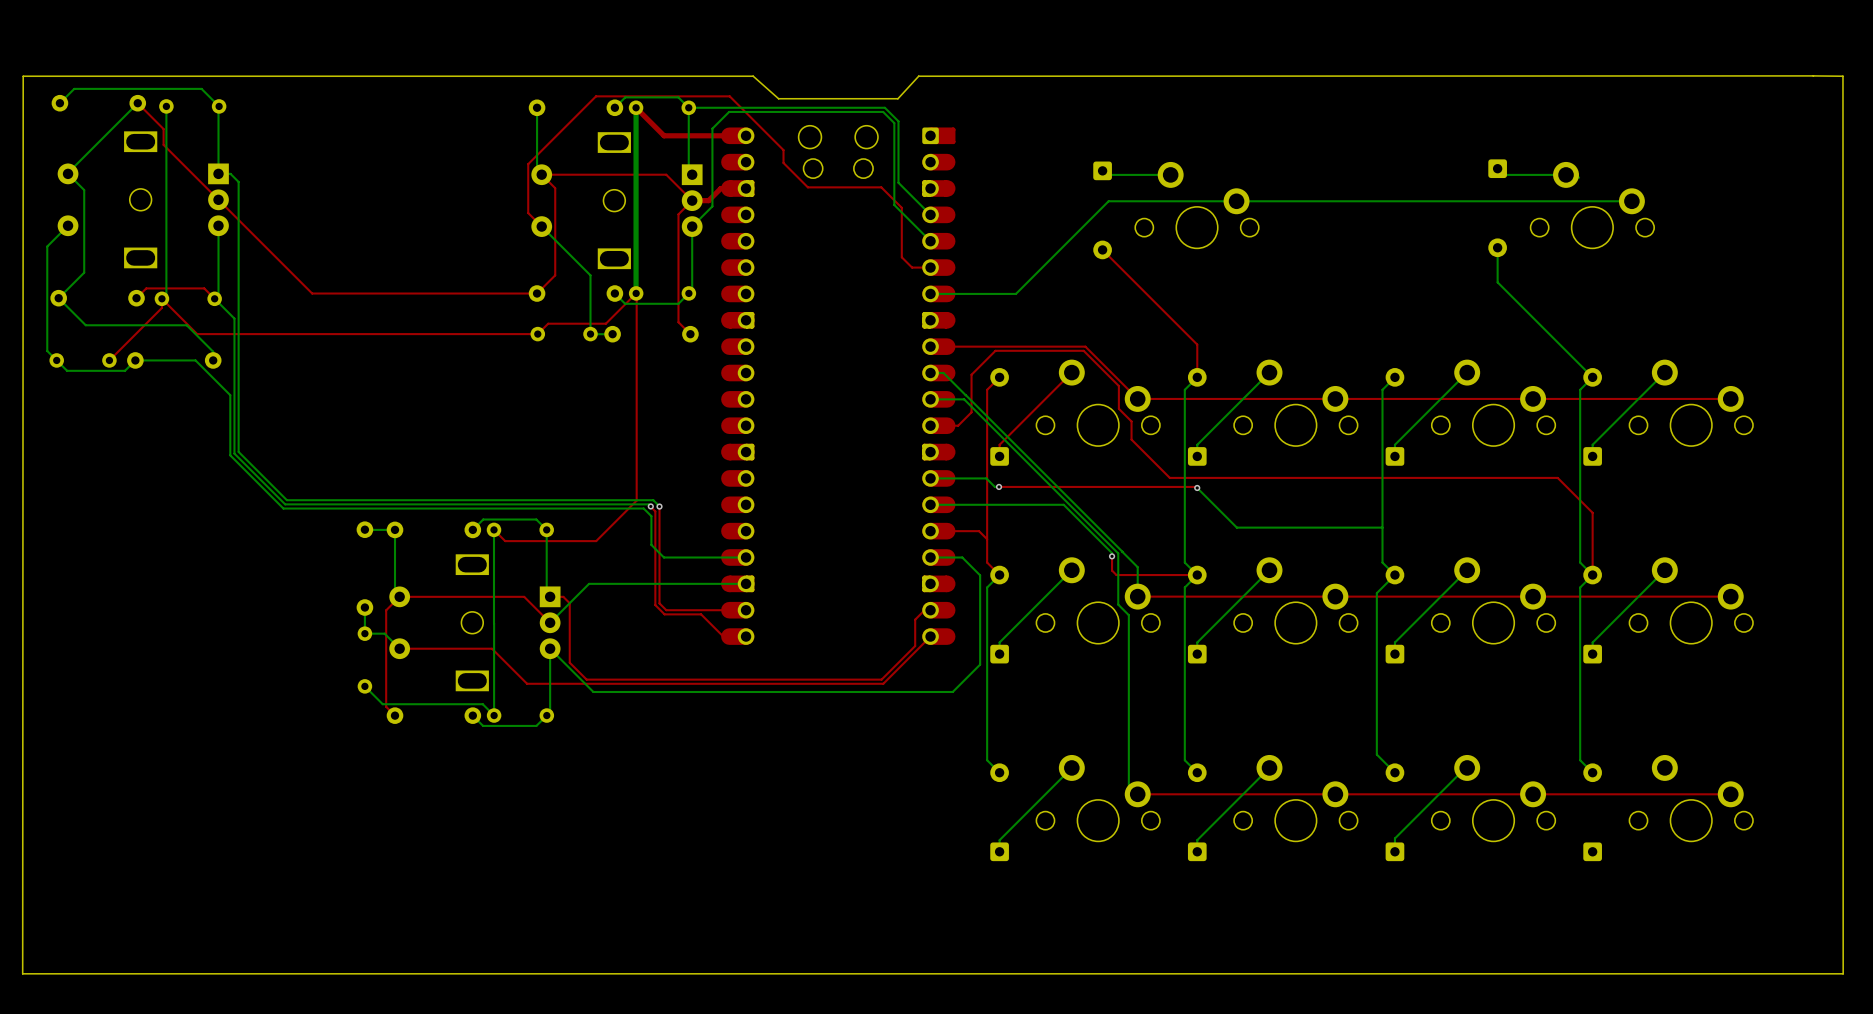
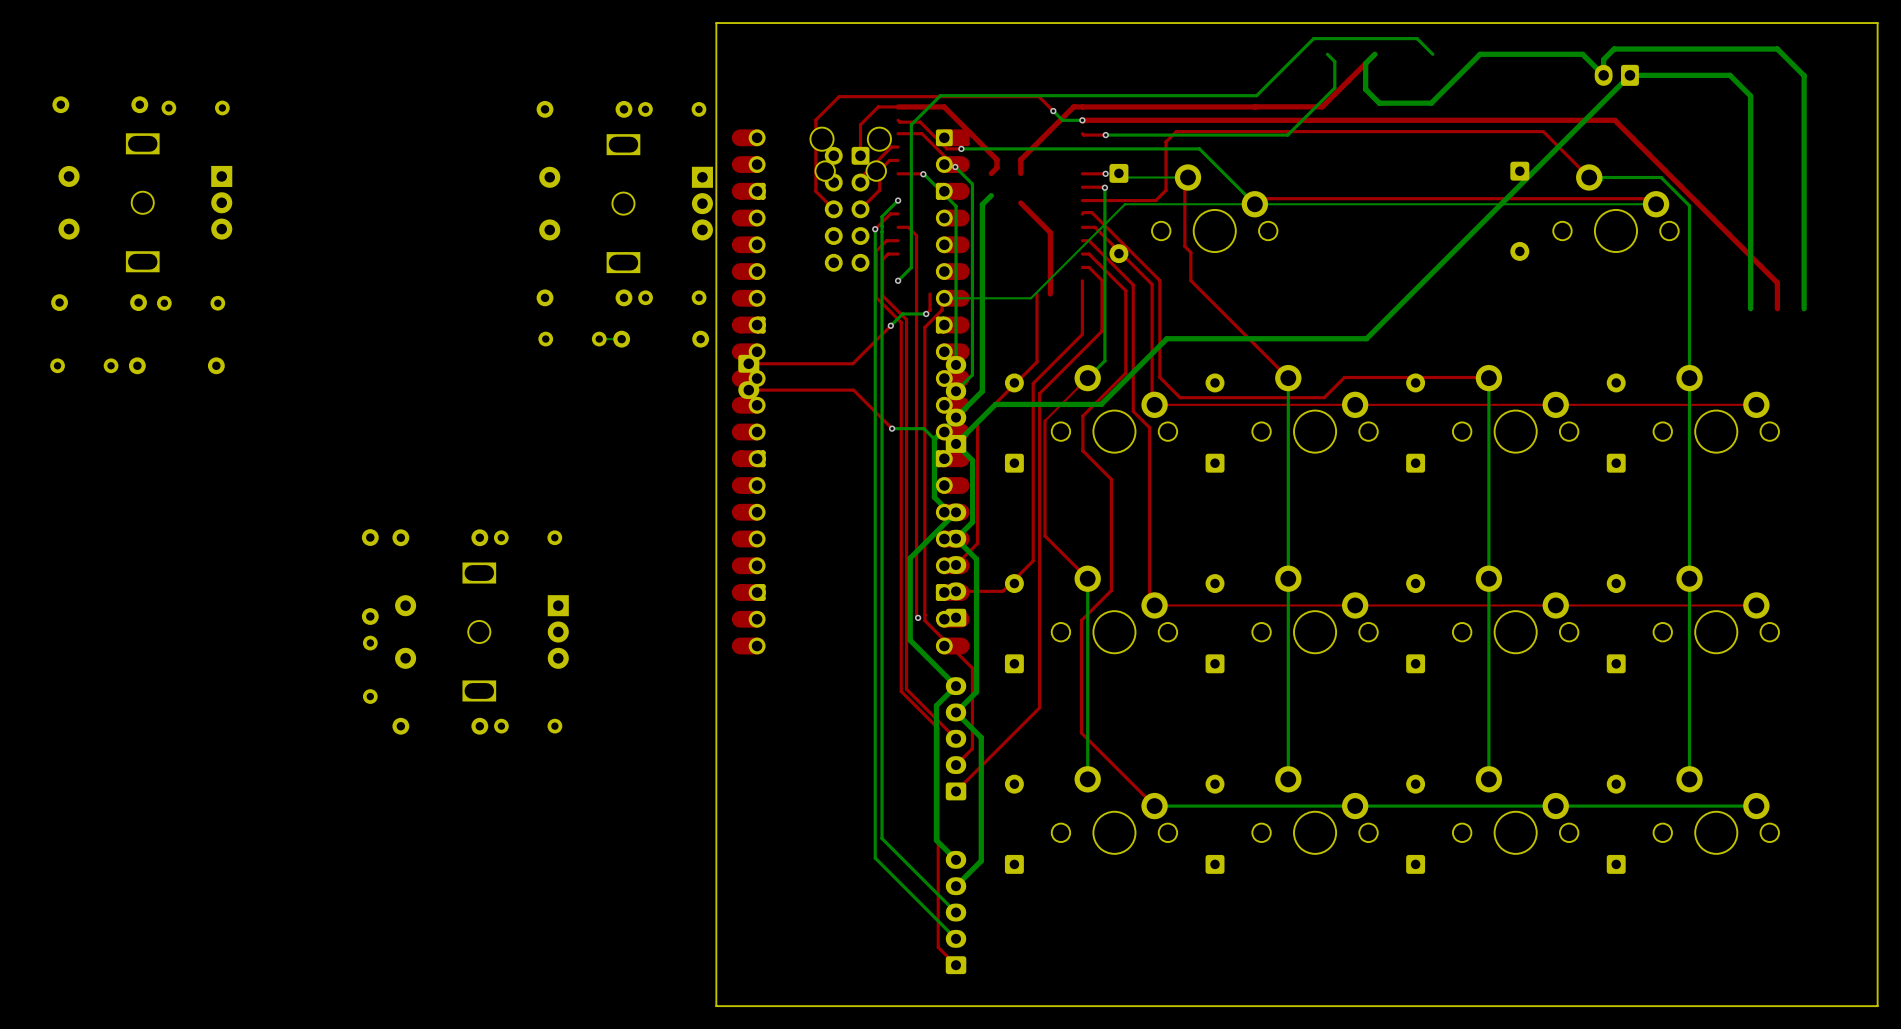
bottom track: none -> (1327, 54) (1334, 61) (1334, 87) (1287, 135) (1105, 135)
top track: none -> (1374, 54) (1348, 80)
bottom track: none -> (1374, 54) (1365, 63) (1365, 89) (1379, 103) (1431, 103) (1480, 54) (1582, 54) (1603, 75) (1603, 59) (1614, 49) (1777, 49) (1804, 75) (1804, 308)
bottom track: none -> (1432, 54) (1417, 38) (1313, 38) (1256, 95) (940, 95) (911, 124) (911, 267) (898, 280)
part: none -> (1616, 75)
board edge: (23, 76) (753, 76) (778, 98) (897, 98) (918, 76) (1842, 76) (1843, 973) (22, 973) (23, 76) -> (1877, 23) (1877, 1006) (716, 1006) (716, 23) (1877, 23)
top track: none -> (1348, 80) (1322, 106) (1255, 106)
bottom track: (59, 103) (74, 88) (201, 88) (219, 106) (218, 173) (230, 173) (238, 181) (238, 451) (286, 500) (653, 500) (659, 506) -> none
top track: (137, 103) (163, 129) (163, 144) (312, 293) (537, 293) (555, 275) (555, 188) (541, 174) (666, 174) (692, 200) -> none
bottom track: (137, 103) (68, 172) -> none
top track: none -> (1255, 106) (1073, 106) (1020, 159) (1020, 173)
bottom track: (166, 106) (166, 294) (161, 298) -> none
bottom track: (537, 107) (537, 170) (541, 174) -> none
top track: (636, 107) (664, 135) (737, 135) -> none
bottom track: (636, 107) (636, 293) -> none
bottom track: (688, 107) (884, 107) (898, 121) (898, 182) (930, 214) -> none
bottom track: (688, 107) (678, 97) (625, 97) (614, 107) -> none
bottom track: (688, 107) (688, 171) (692, 174) -> none
top track: none -> (1053, 111) (1038, 96) (839, 96) (815, 120) (815, 191) (833, 209)
bottom track: none -> (1053, 111) (1062, 120) (1082, 120)
via: none -> (1053, 111)
top track: none -> (898, 120) (899, 122) (920, 122) (946, 148) (961, 148)
via: none -> (1082, 120)
top track: none -> (1083, 121) (1614, 120) (1777, 282) (1777, 308)
top track: none -> (898, 133) (922, 133) (955, 166)
top track: none -> (1082, 133) (1105, 135)
via: none -> (1105, 135)
top track: none -> (898, 147) (891, 147) (860, 178) (860, 182)
bottom track: none -> (961, 148) (1199, 148) (1254, 204) (1260, 198)
via: none -> (961, 148)
top track: none -> (860, 155) (860, 124) (878, 106) (944, 106) (996, 159) (996, 167) (991, 173)
top track: none -> (898, 160) (889, 160) (879, 170) (879, 190) (860, 209)
bottom track: (68, 164) (68, 173) (84, 190) (84, 272) (58, 298) (85, 325) (186, 325) (213, 351) (213, 360) -> none
bottom track: none -> (955, 166) (972, 184) (972, 374) (956, 391)
via: none -> (955, 166)
bottom track: (1559, 168) (1566, 174) (1503, 174) (1497, 168) -> none
top track: none -> (898, 173) (923, 174)
bottom track: none -> (923, 174) (956, 206) (956, 364)
via: none -> (923, 174)
top track: none -> (1105, 173) (1082, 173)
via: none -> (1105, 173)
top track: none -> (1589, 177) (1543, 131) (1176, 131) (1165, 141) (1165, 190) (1155, 200) (1082, 200)
bottom track: none -> (1589, 177) (1661, 177) (1689, 205) (1689, 779)
top track: none -> (1184, 180) (1184, 246) (1190, 252) (1190, 280) (1288, 378)
top track: none -> (1082, 187) (1104, 187)
bottom track: none -> (1104, 187) (1104, 360) (1087, 378)
via: none -> (1104, 187)
top track: (737, 188) (720, 188) (708, 200) (692, 200) -> none
bottom track: none -> (991, 195) (982, 204) (982, 391) (934, 439)
top track: none -> (1650, 198) (1260, 198)
bottom track: none -> (898, 200) (881, 216) (881, 226)
via: none -> (898, 200)
top track: (692, 200) (678, 214) (678, 322) (690, 334) -> none
top track: none -> (1020, 202) (1050, 232) (1049, 294)
part: none -> (847, 209)
top track: none -> (898, 213) (890, 213) (875, 229)
top track: none -> (1082, 213) (1091, 212) (1159, 280) (1159, 377) (1180, 397) (1324, 397) (1344, 377) (1488, 378)
bottom track: none -> (882, 226) (882, 232)
top track: none -> (898, 227) (908, 227) (916, 235) (916, 616) (918, 617)
bottom track: (68, 225) (47, 246) (47, 350) (67, 370) (124, 370) (135, 360) (195, 360) (230, 395) (230, 455) (283, 508) (643, 508) (651, 516) (651, 544) (663, 557) (746, 557) -> none
bottom track: (218, 225) (218, 294) (214, 298) (234, 318) (234, 453) (285, 504) (648, 504) (650, 506) -> none
bottom track: none -> (875, 229) (875, 858) (956, 938)
via: none -> (875, 229)
top track: (541, 226) (528, 213) (528, 164) (596, 96) (729, 96) (783, 150) (783, 162) (807, 187) (881, 187) (901, 207) (901, 257) (912, 267) (930, 267) -> none
bottom track: (541, 226) (590, 275) (590, 334) -> none
bottom track: none -> (881, 232) (881, 838) (956, 912)
top track: none -> (898, 240) (886, 240) (876, 250) (876, 297) (901, 322) (901, 691) (938, 728) (938, 947) (956, 965)
top track: none -> (1082, 240) (1089, 240) (1133, 284) (1133, 411) (1149, 427) (1149, 600) (1154, 605)
bottom track: (930, 241) (894, 204) (894, 123) (883, 111) (729, 111) (712, 128) (712, 206) (692, 226) (692, 290) (678, 303) (625, 303) (614, 293) -> none
bottom track: (1497, 247) (1497, 282) (1592, 377) (1580, 389) (1580, 562) (1592, 575) (1580, 587) (1580, 760) (1592, 772) -> none
top track: (1102, 249) (1197, 344) (1197, 377) -> none
top track: none -> (898, 254) (888, 254) (882, 259) (882, 295) (906, 319) (906, 689) (956, 738)
top track: none -> (1082, 267) (1089, 267) (1101, 280) (1101, 331) (1039, 393) (1039, 707) (956, 791)
via: none -> (898, 280)
top track: none -> (1082, 280) (1082, 334) (1033, 383) (1033, 560) (1002, 591) (956, 591)
top track: none -> (930, 293) (930, 310) (926, 313)
top track: none -> (943, 293) (942, 310) (924, 327) (924, 614)
top track: none -> (1036, 293) (1036, 361) (977, 421) (977, 543) (956, 565) (946, 565)
top track: (136, 298) (146, 288) (204, 288) (214, 298) -> none
bottom track: none -> (1750, 308) (1750, 96) (1730, 75) (1629, 75) (1366, 338) (1166, 338) (1101, 404) (995, 404) (956, 443) (972, 460) (972, 522) (956, 538) (976, 559) (976, 691) (956, 712) (981, 737) (981, 860) (956, 886)
bottom track: none -> (926, 313) (902, 313) (890, 325)
via: none -> (926, 313)
top track: none -> (890, 325) (852, 363) (748, 363)
via: none -> (890, 325)
top track: (930, 346) (1085, 346) (1135, 396) -> (1082, 227) (1095, 227) (1152, 284) (1152, 402)
top track: (109, 360) (161, 307) (161, 298) (197, 334) (537, 334) (548, 323) (605, 323) (636, 293) (636, 500) (596, 541) (505, 541) (494, 529) -> none
part: none -> (748, 376)
bottom track: (1269, 372) (1197, 444) (1197, 456) -> (1288, 378) (1288, 779)
bottom track: (1467, 372) (1394, 444) (1394, 456) -> (1488, 378) (1488, 779)
bottom track: (1664, 372) (1592, 444) (1592, 456) -> none
bottom track: (930, 373) (943, 373) (965, 395) -> none
top track: (999, 377) (987, 389) (987, 562) (999, 575) -> none
bottom track: (1197, 377) (1184, 389) (1184, 562) (1197, 575) (1184, 587) (1184, 760) (1197, 772) -> none
bottom track: (1394, 377) (1382, 389) (1382, 562) (1394, 575) (1376, 593) (1376, 754) (1394, 772) -> none
top track: none -> (748, 390) (853, 390) (892, 428)
bottom track: (965, 395) (1122, 551) -> none
part: none -> (956, 404)
bottom track: (930, 399) (964, 399) (1118, 553) (1118, 604) (1128, 615) (1128, 785) (1137, 794) -> (1756, 806) (1154, 806)
top track: (1029, 414) (999, 444) (999, 456) -> (1045, 420) (1045, 536) (1087, 578)
bottom track: none -> (892, 428) (923, 428) (934, 439)
via: none -> (892, 428)
top track: (938, 425) (958, 425) (971, 412) (971, 374) (995, 350) (1083, 350) (1118, 386) (1118, 408) (1131, 421) (1131, 439) (1169, 477) (1557, 477) (1592, 512) (1592, 575) -> none
bottom track: none -> (934, 439) (934, 497) (949, 512) (956, 512) (910, 558) (910, 640) (956, 686) (936, 705) (936, 840) (956, 859)
bottom track: (930, 478) (986, 478) (994, 486) (999, 486) -> none
top track: (999, 486) (1197, 487) -> none
via: (999, 486) -> none
bottom track: (1197, 487) (1236, 527) (1382, 527) -> none
via: (1197, 487) -> none
bottom track: (930, 504) (1063, 504) (1112, 553) (1112, 556) -> none
top track: (650, 506) (655, 511) (655, 605) (664, 614) (701, 614) (723, 636) (737, 636) -> none
via: (650, 506) -> none
top track: (659, 506) (659, 603) (666, 610) (737, 610) -> none
via: (659, 506) -> none
bottom track: (364, 529) (395, 529) (395, 592) (399, 596) -> none
bottom track: (472, 529) (483, 519) (536, 519) (546, 529) (546, 593) (550, 596) -> none
bottom track: (494, 529) (494, 623) -> none
top track: (938, 531) (979, 531) (987, 539) -> none
bottom track: (1122, 551) (1137, 567) (1137, 596) -> none
part: none -> (956, 565)
top track: (1112, 556) (1112, 570) (1116, 575) (1197, 575) -> none
via: (1112, 556) -> none
bottom track: (930, 557) (962, 557) (980, 575) (980, 664) (952, 691) (593, 691) (550, 648) (550, 712) (536, 725) (483, 725) (472, 715) -> none
bottom track: (1071, 570) (999, 642) (999, 654) -> (1087, 578) (1087, 779)
bottom track: (1269, 570) (1197, 642) (1197, 654) -> none
bottom track: (1467, 570) (1394, 642) (1394, 654) -> none
bottom track: (1664, 570) (1592, 642) (1592, 654) -> none
bottom track: (999, 575) (987, 587) (987, 760) (999, 772) -> none
bottom track: (746, 583) (589, 583) (550, 622) -> none
top track: (550, 596) (563, 596) (569, 603) (569, 662) (586, 679) (881, 679) (915, 646) (915, 619) (924, 610) (930, 610) -> none
top track: none -> (924, 615) (924, 620) (972, 668) (972, 748) (956, 765)
bottom track: (364, 607) (364, 633) (384, 633) (399, 648) -> none
via: none -> (918, 617)
top track: (550, 622) (524, 596) (399, 596) (386, 610) (386, 706) (395, 715) -> none
bottom track: (494, 623) (494, 715) (482, 704) (382, 704) (364, 686) -> none
top track: (930, 636) (883, 683) (527, 683) (492, 648) (399, 648) -> none
part: none -> (956, 738)
bottom track: (1071, 767) (999, 840) (999, 851) -> none
bottom track: (1269, 767) (1197, 840) (1197, 851) -> none
bottom track: (1467, 767) (1394, 838) (1394, 851) -> none
top track: (1730, 794) (1137, 794) -> (1082, 254) (1089, 254) (1125, 290) (1125, 373) (1082, 416) (1082, 450) (1111, 479) (1111, 590) (1081, 620) (1081, 733) (1154, 806)
part: none -> (956, 912)

